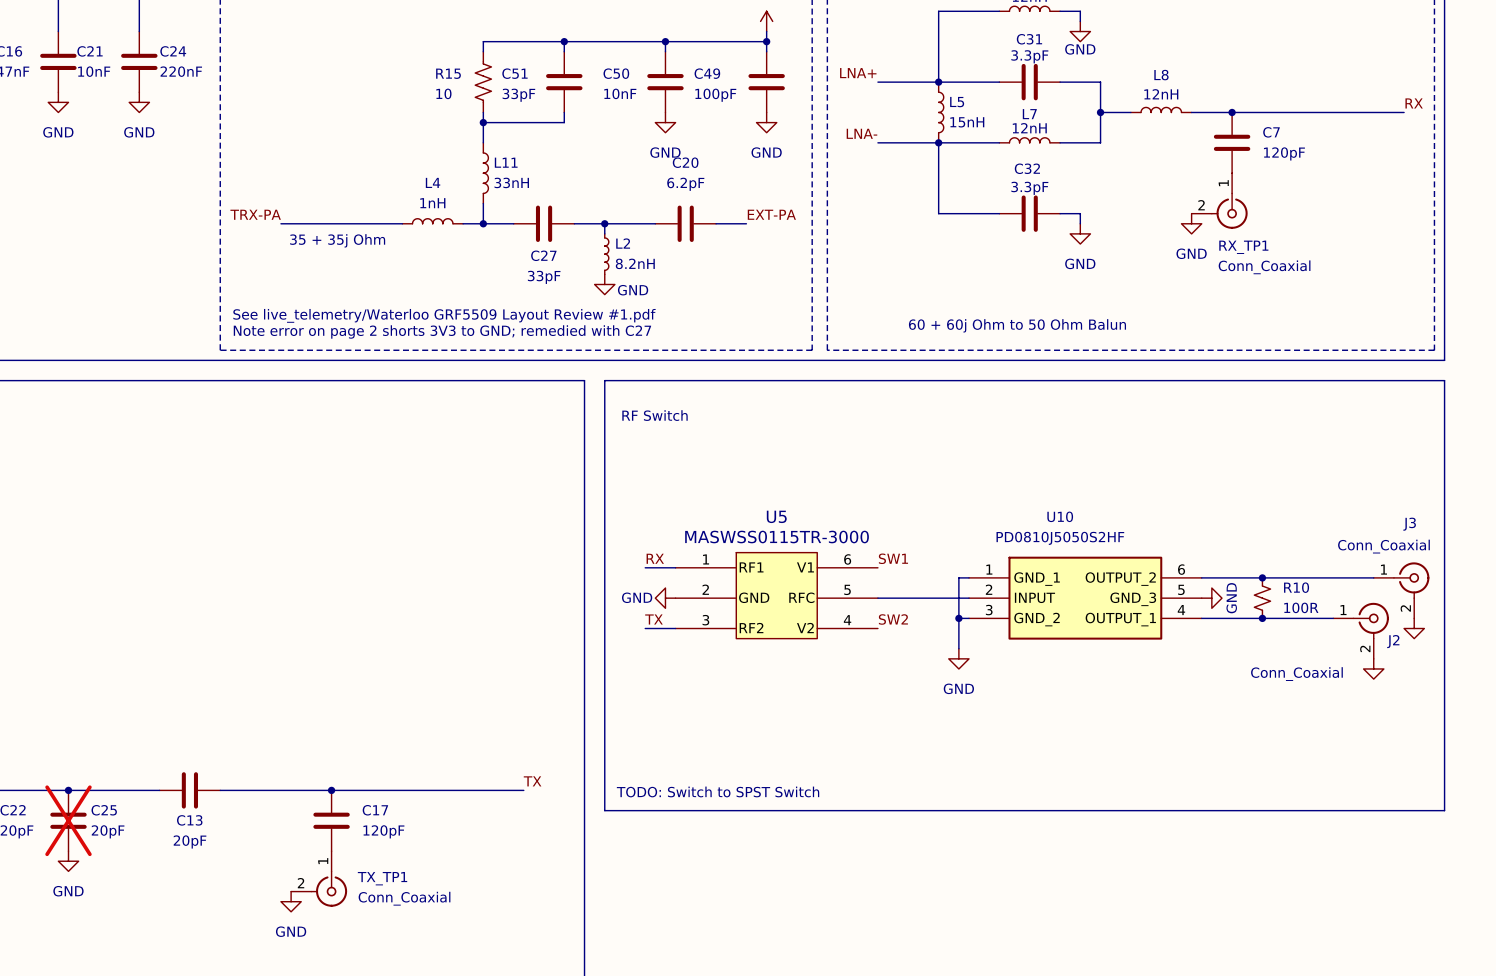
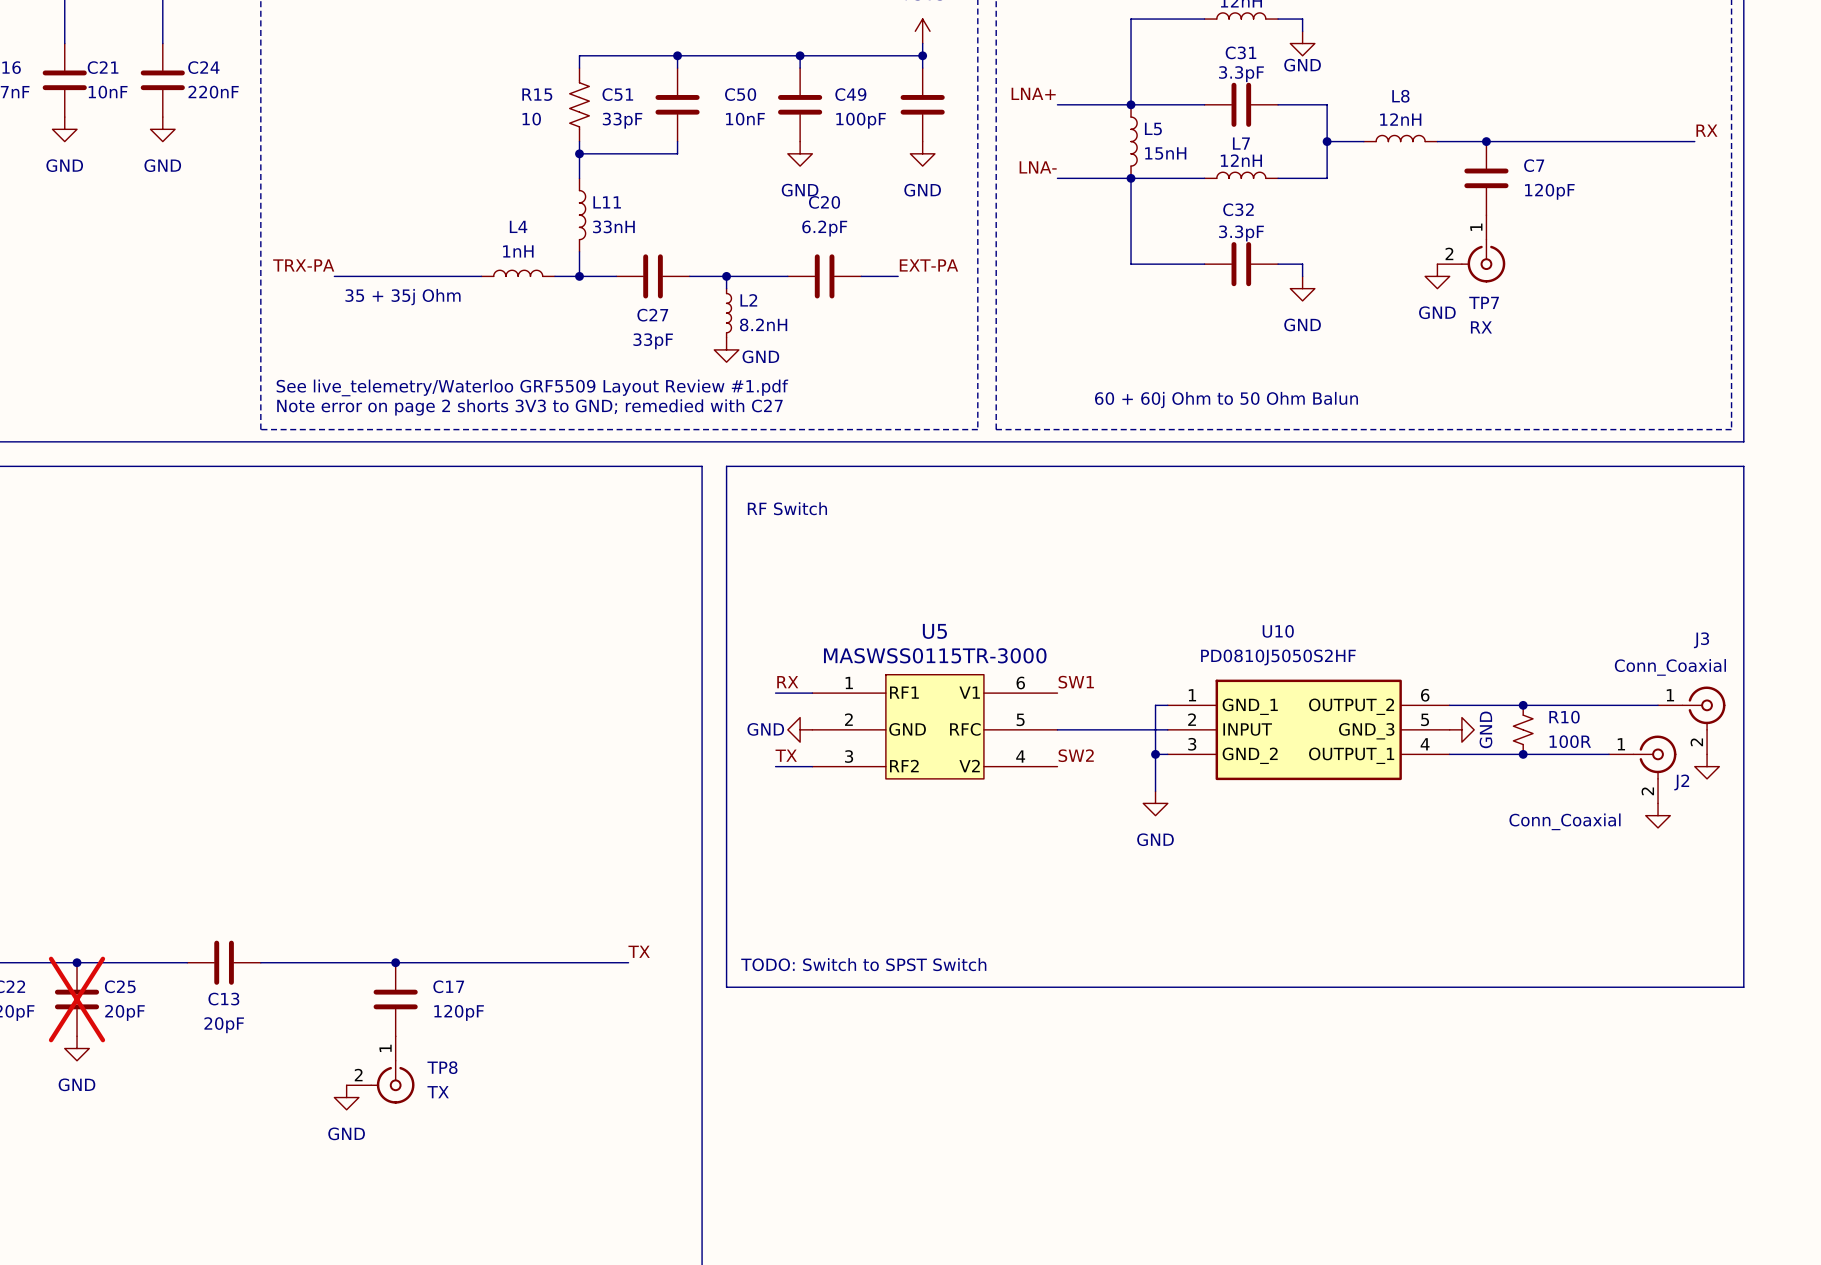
RX_TP1 name: RX_TP1 (1243, 247) -> TP7 (1484, 302)
RX_TP1 value: Conn_Coaxial (1264, 267) -> RX (1481, 327)
TX_TP1 name: TX_TP1 (382, 878) -> TP8 (442, 1067)
TX_TP1 value: Conn_Coaxial (404, 898) -> TX (438, 1092)

